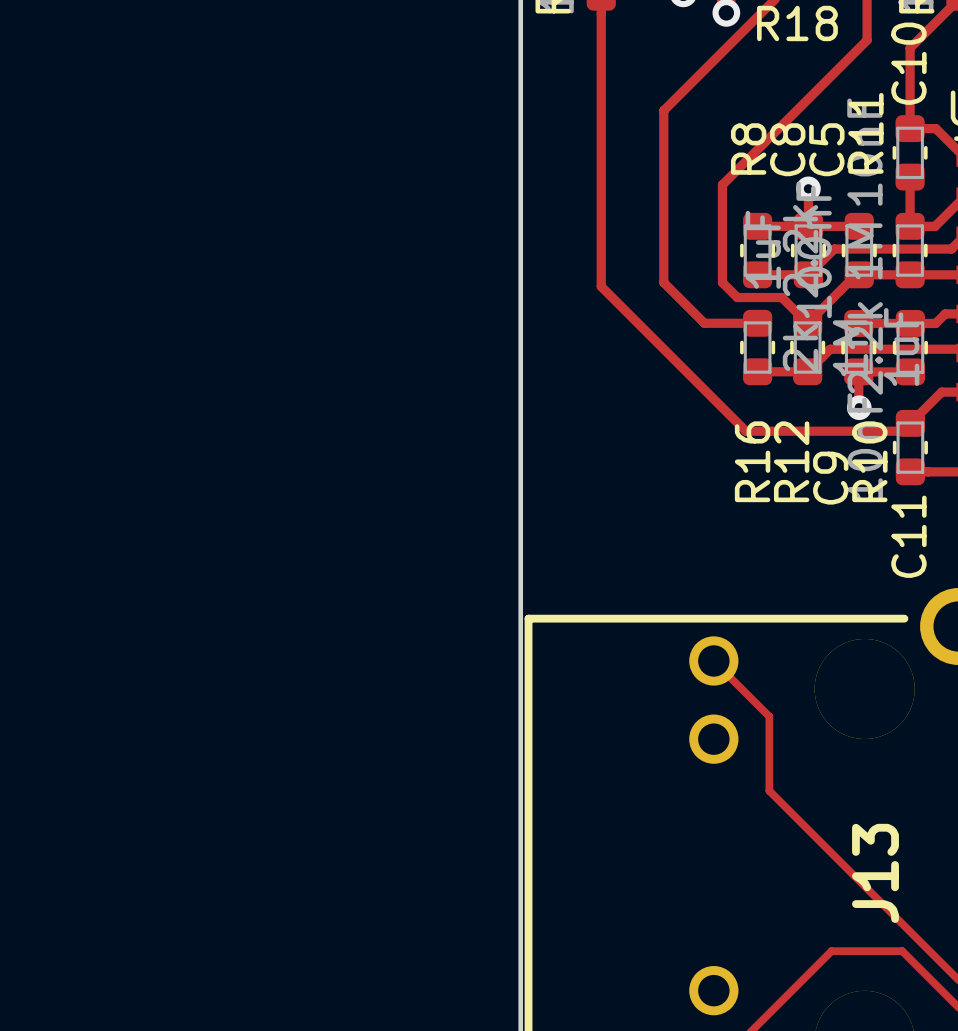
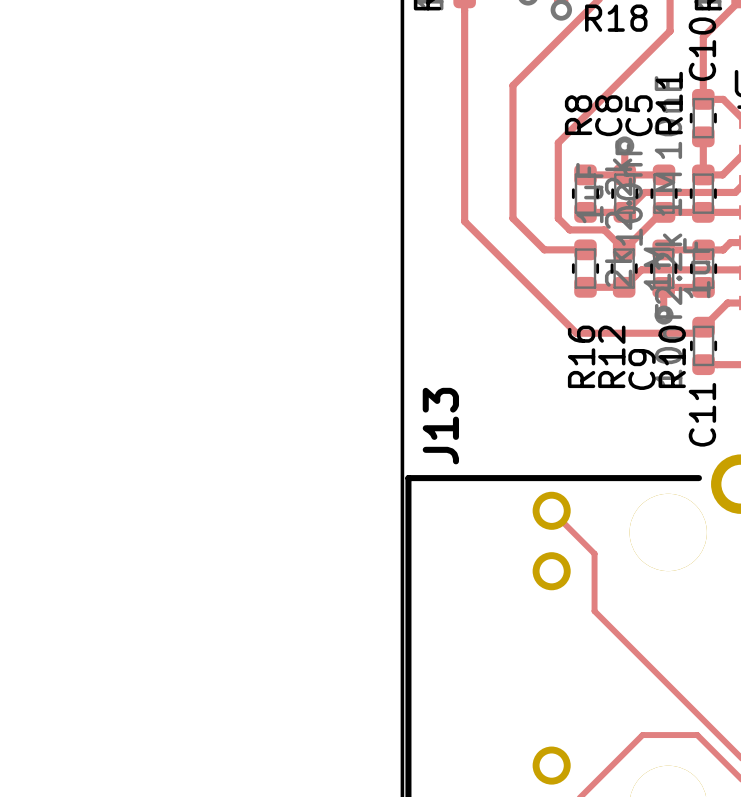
J13 name position: J13 (875, 873) -> J13 (440, 426)

